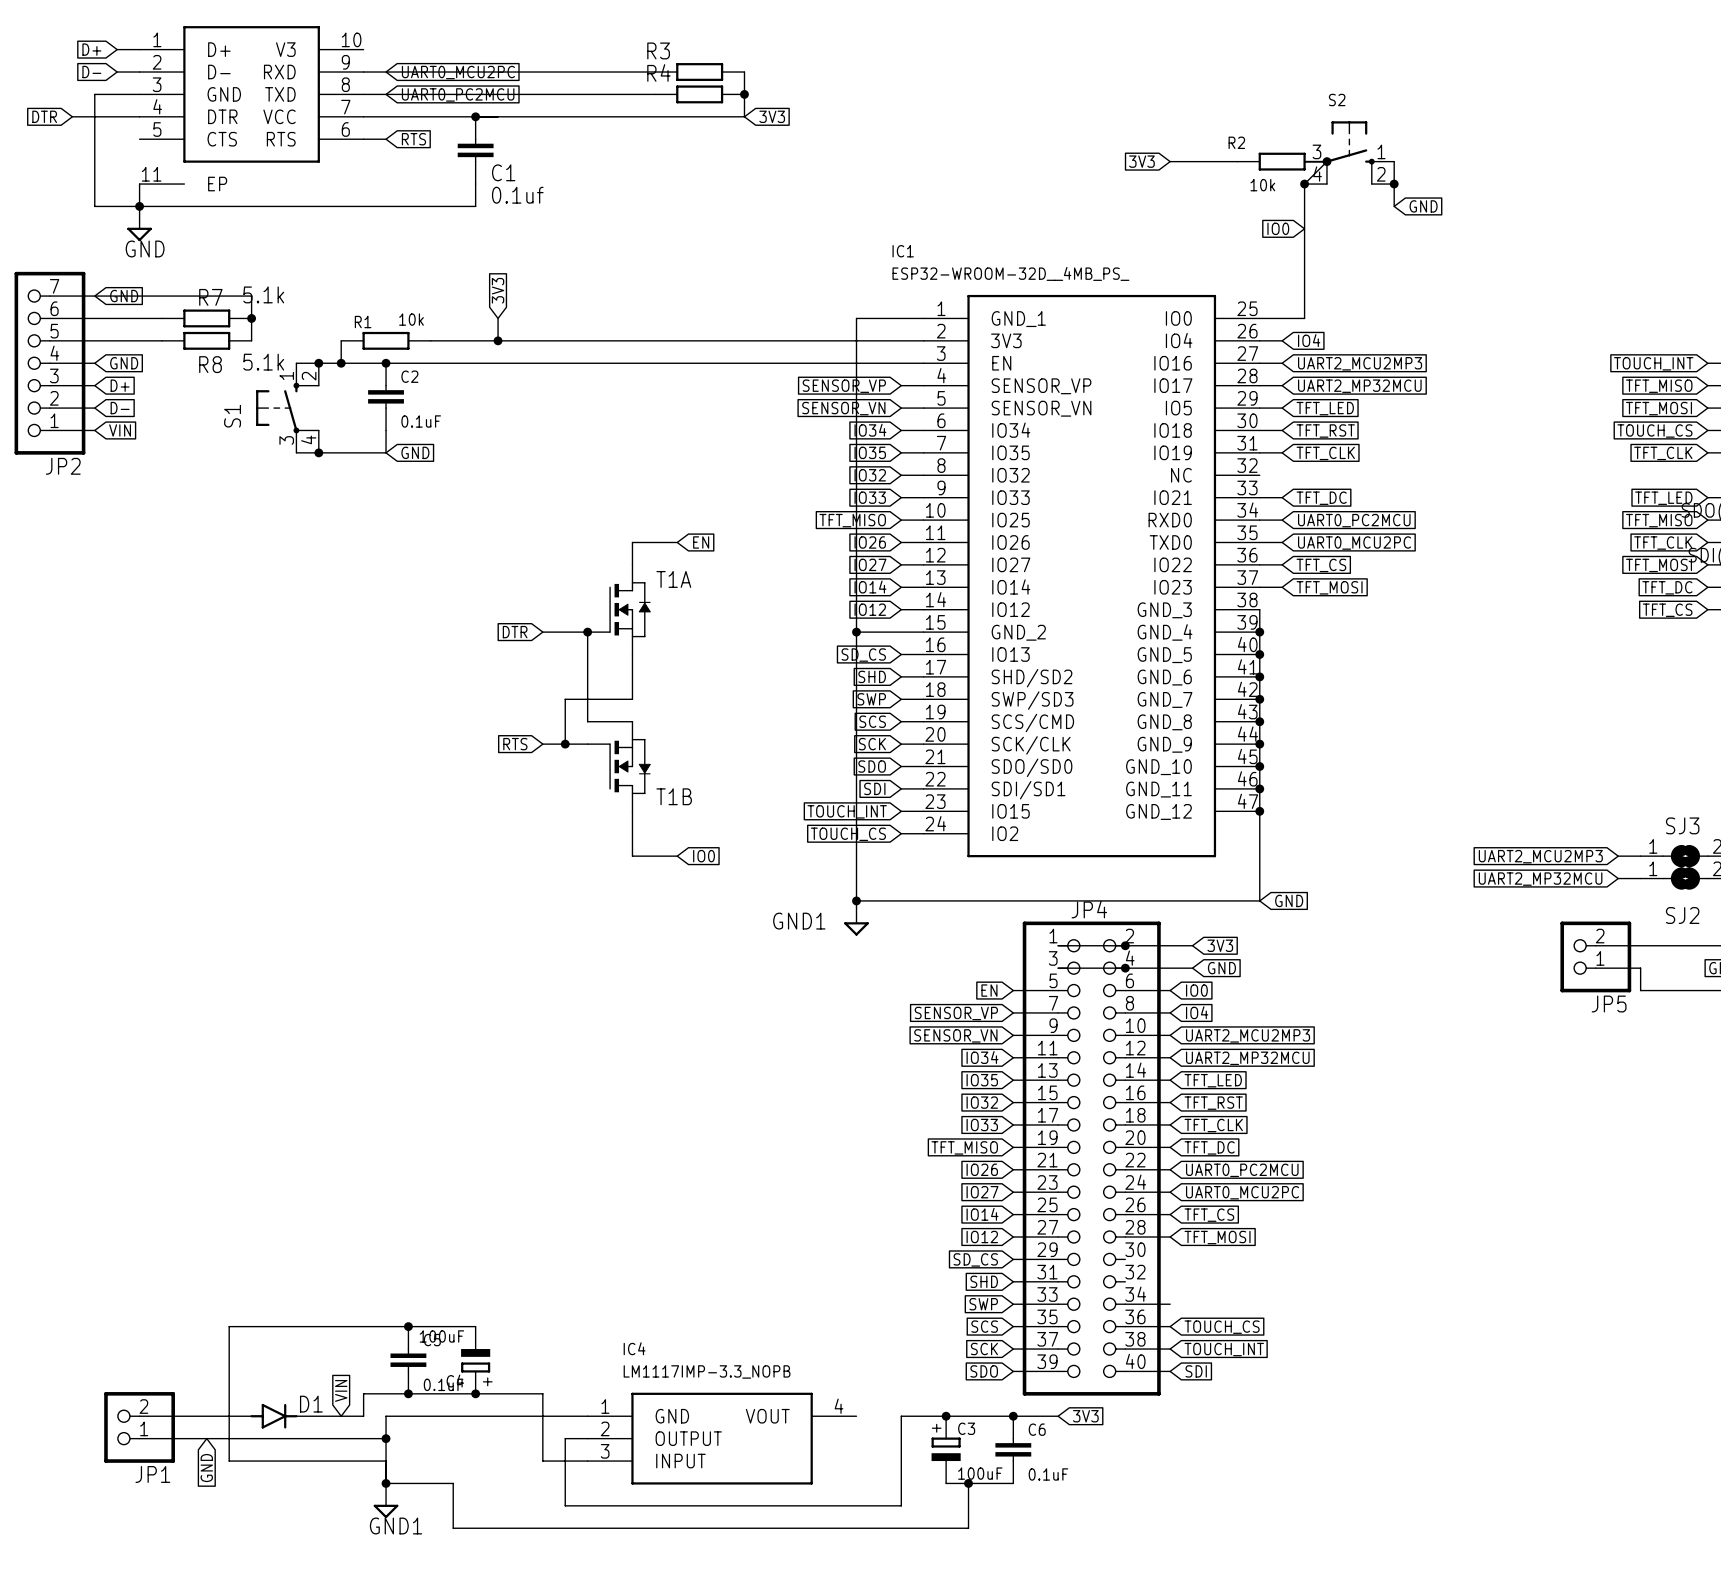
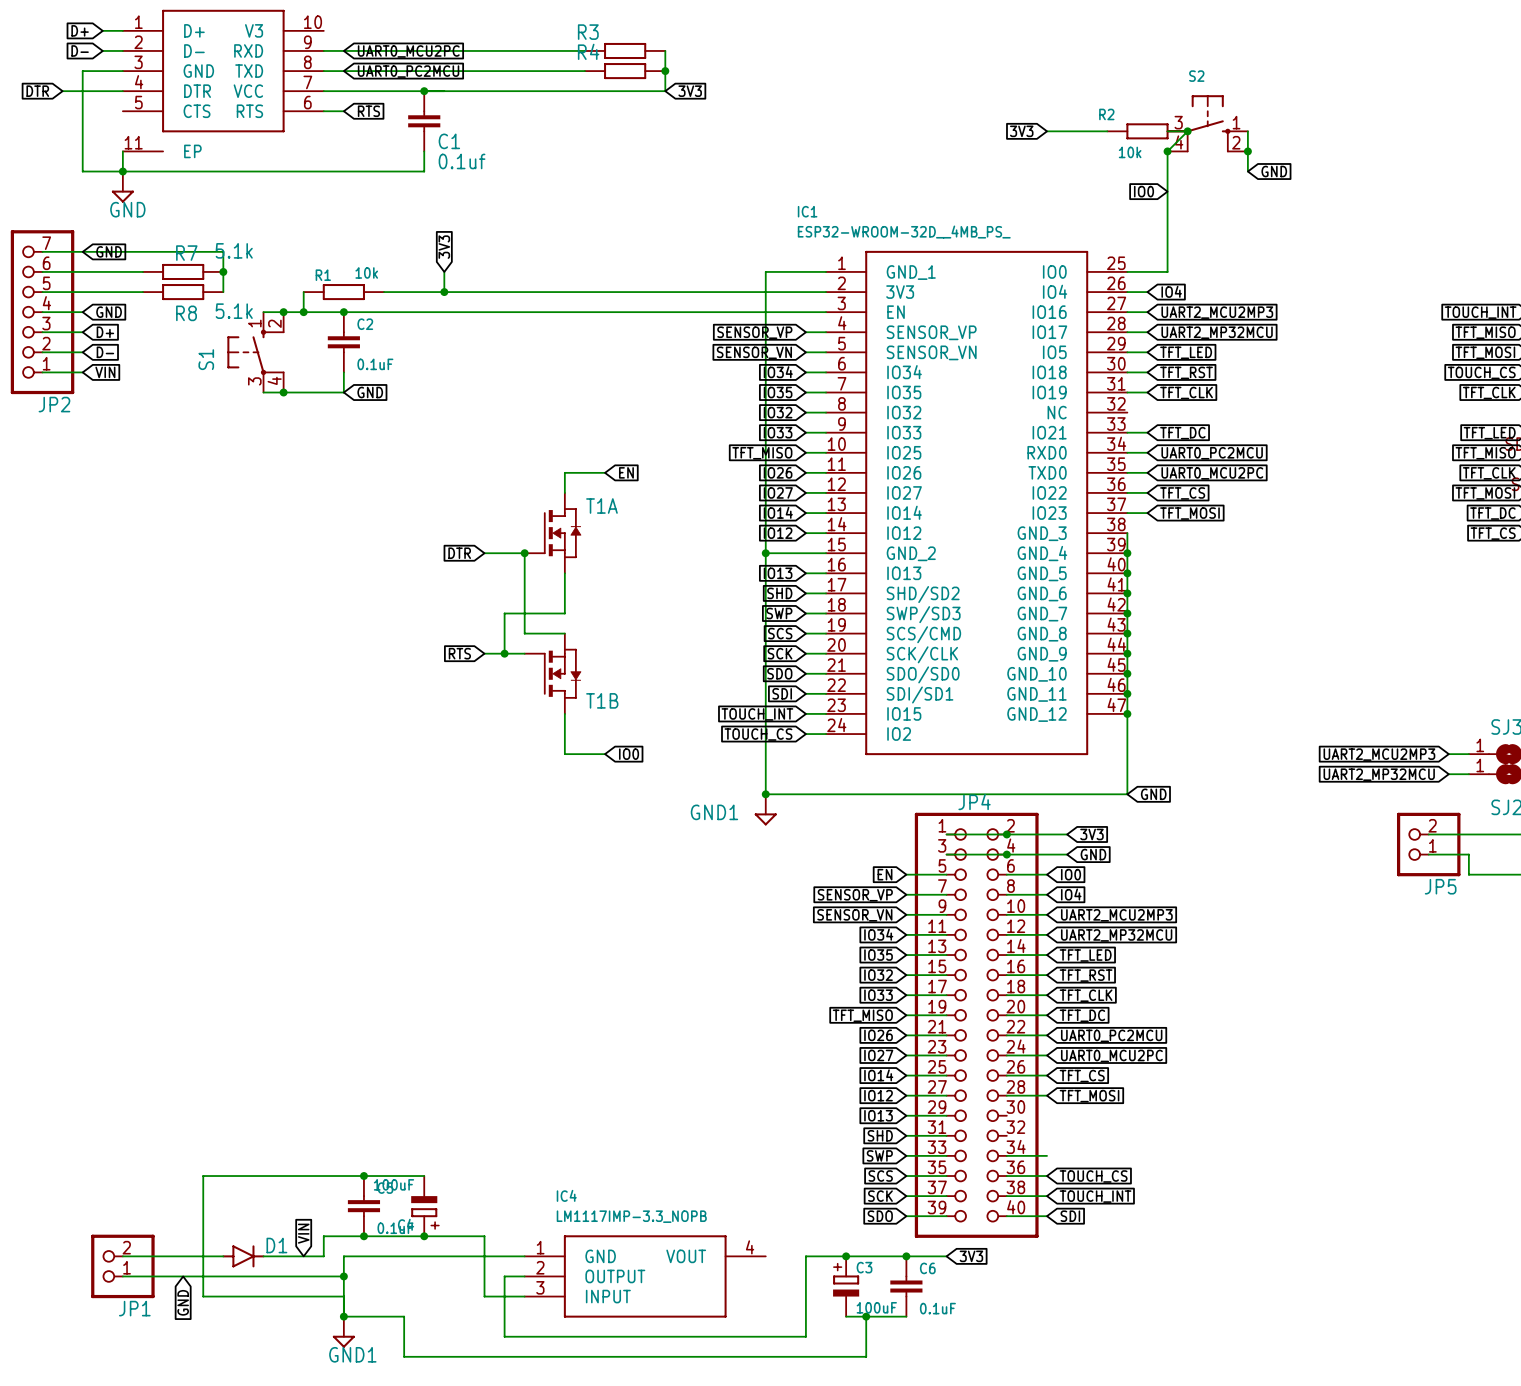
global label: SD_CS (863, 655) -> IO13 (778, 573)
global label: SD_CS (975, 1259) -> IO13 (878, 1115)

